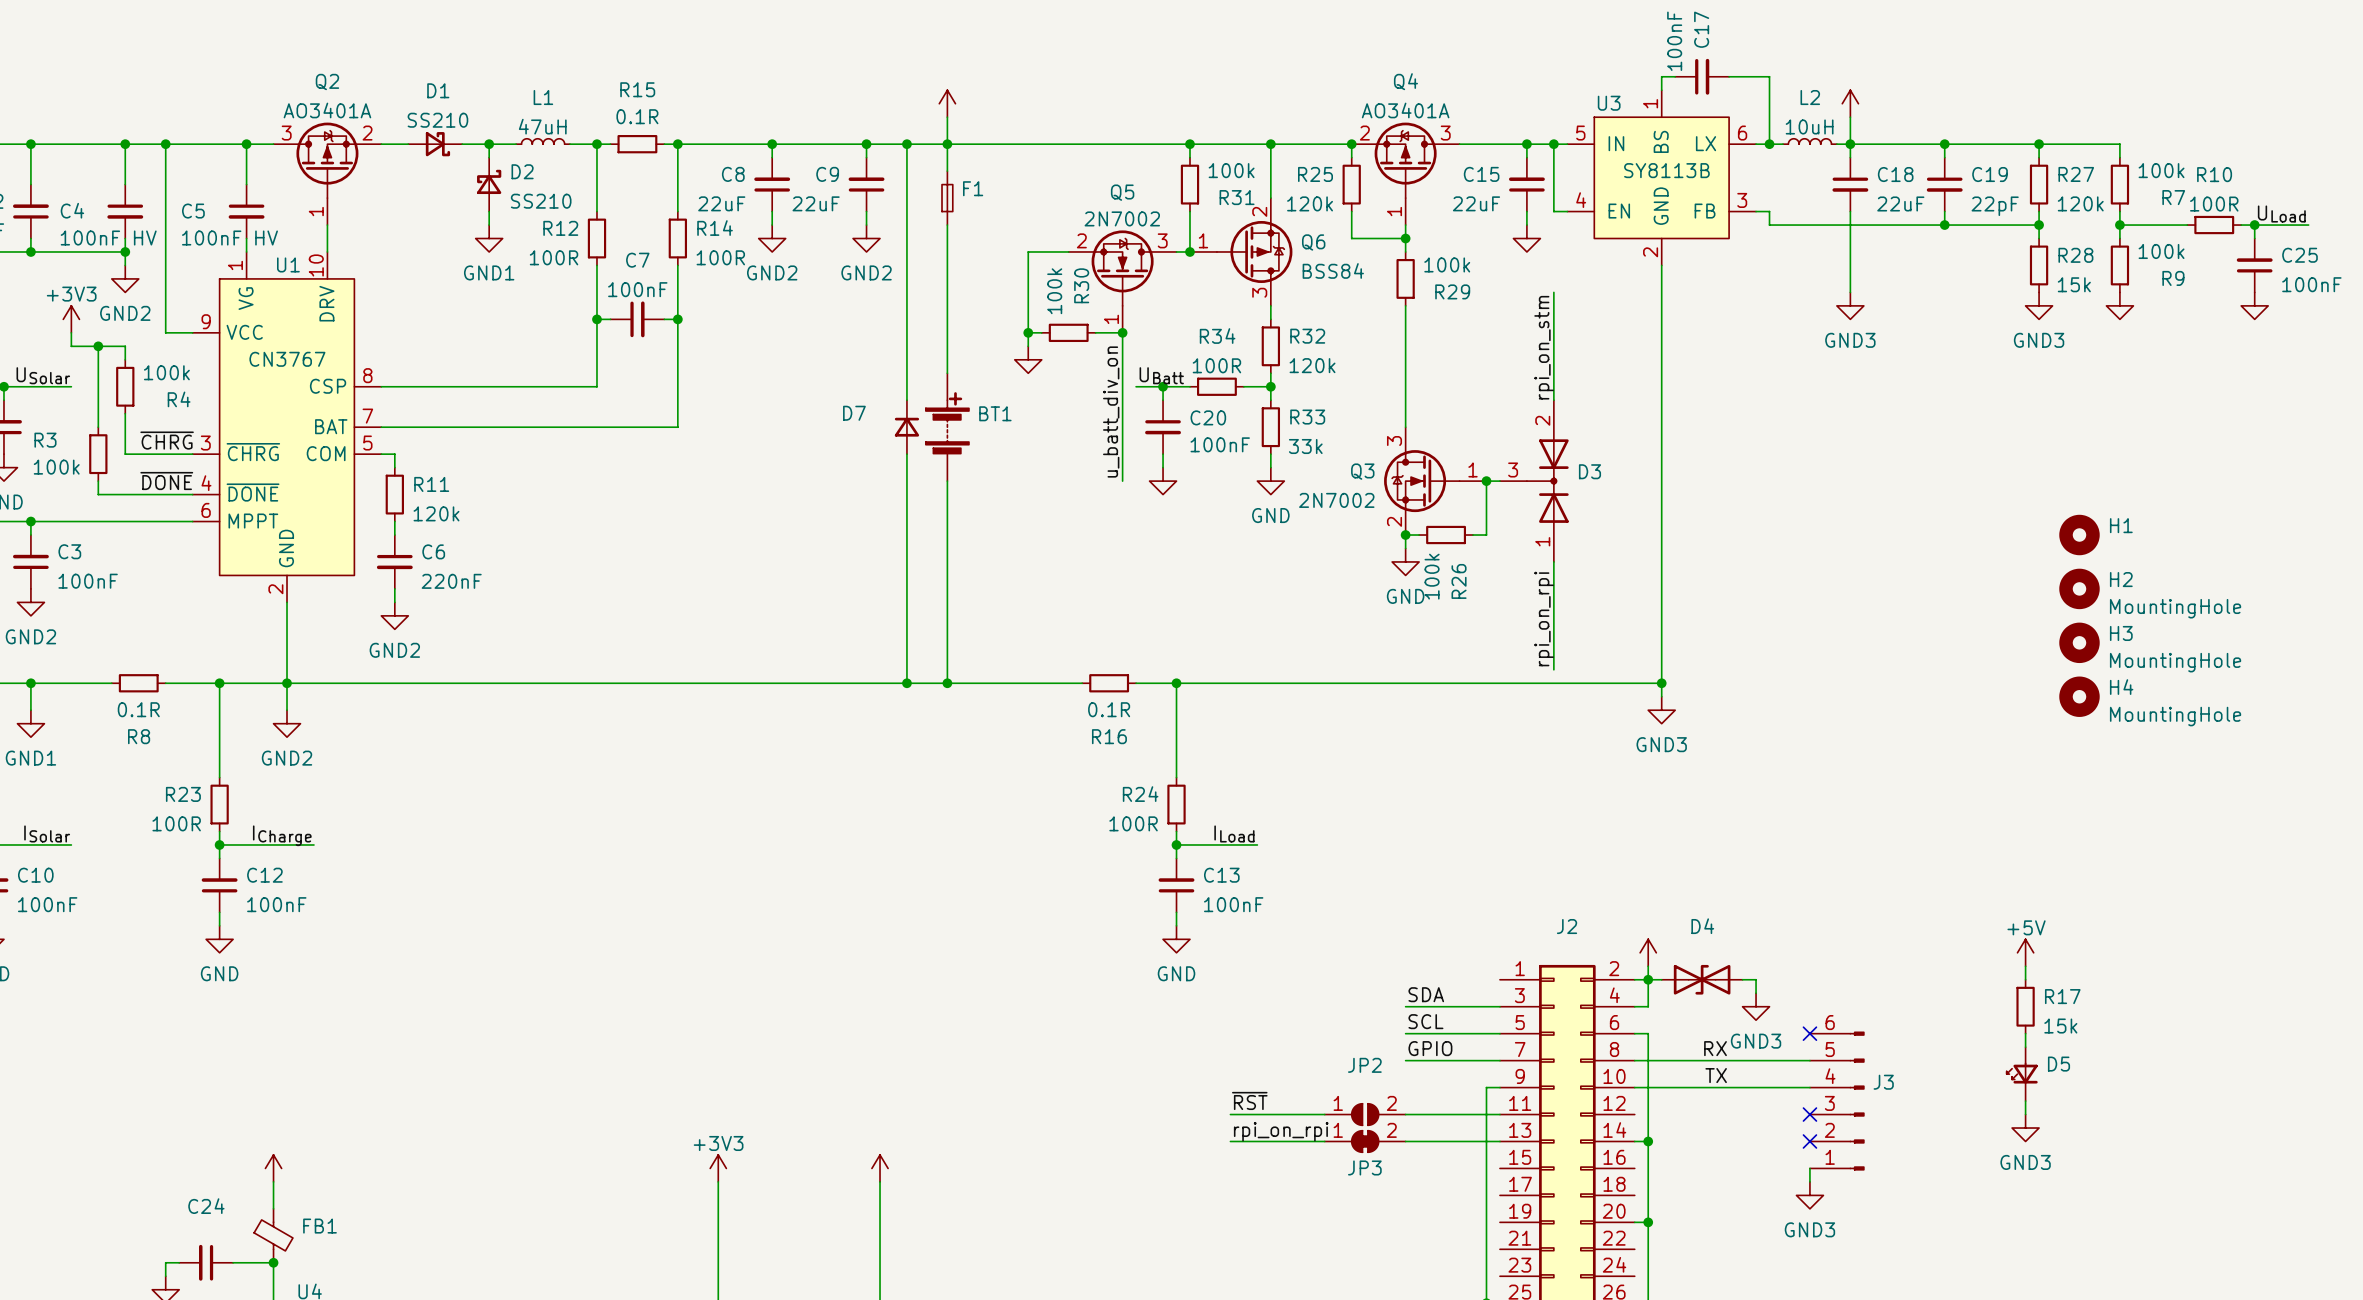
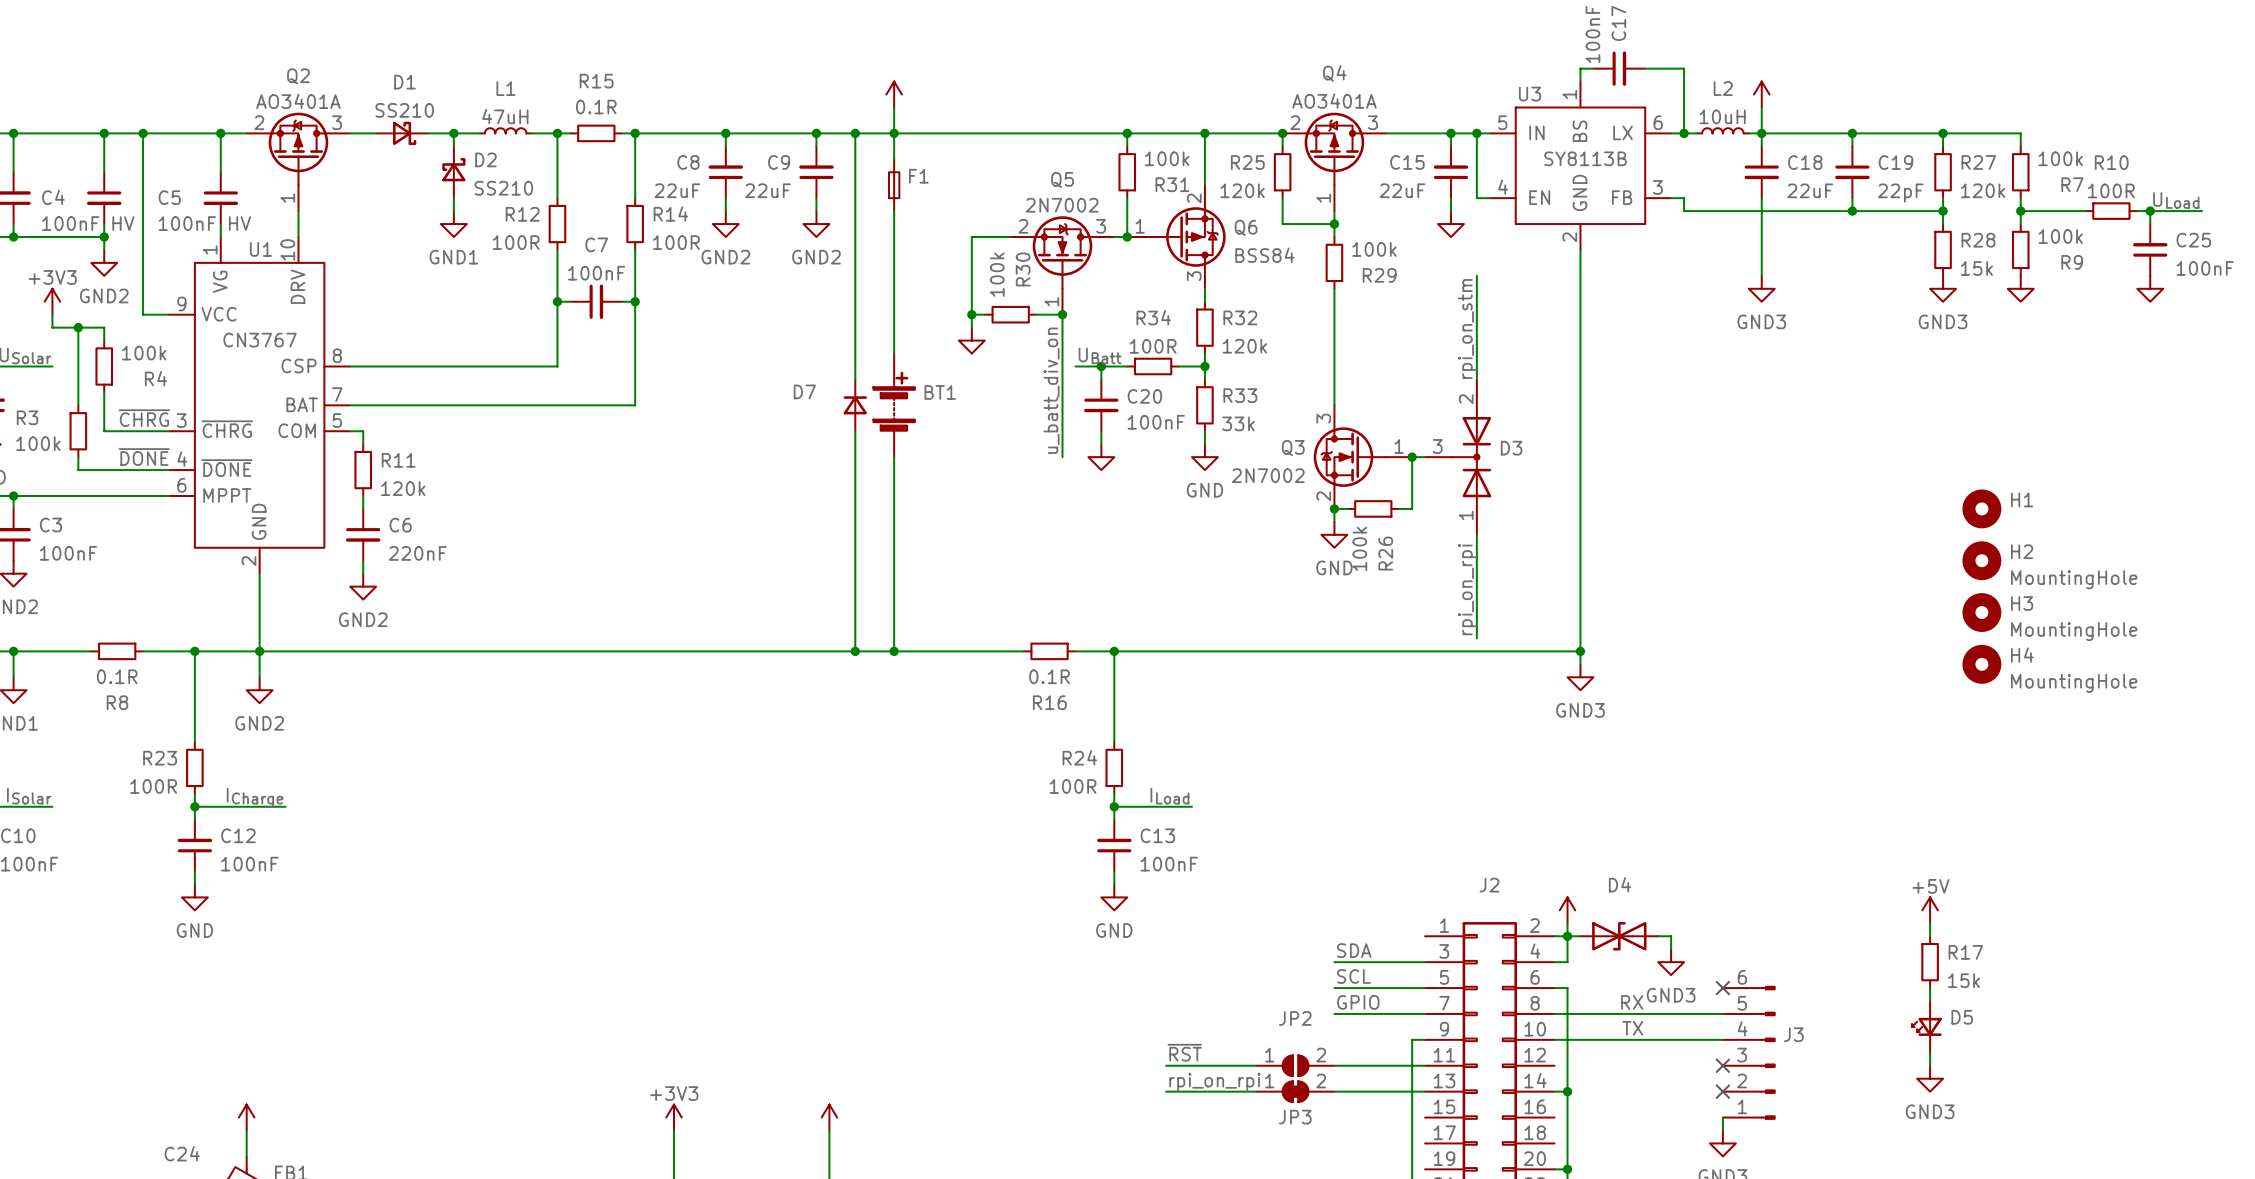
Q2 flip: as is (327, 160) -> left-right (298, 148)

